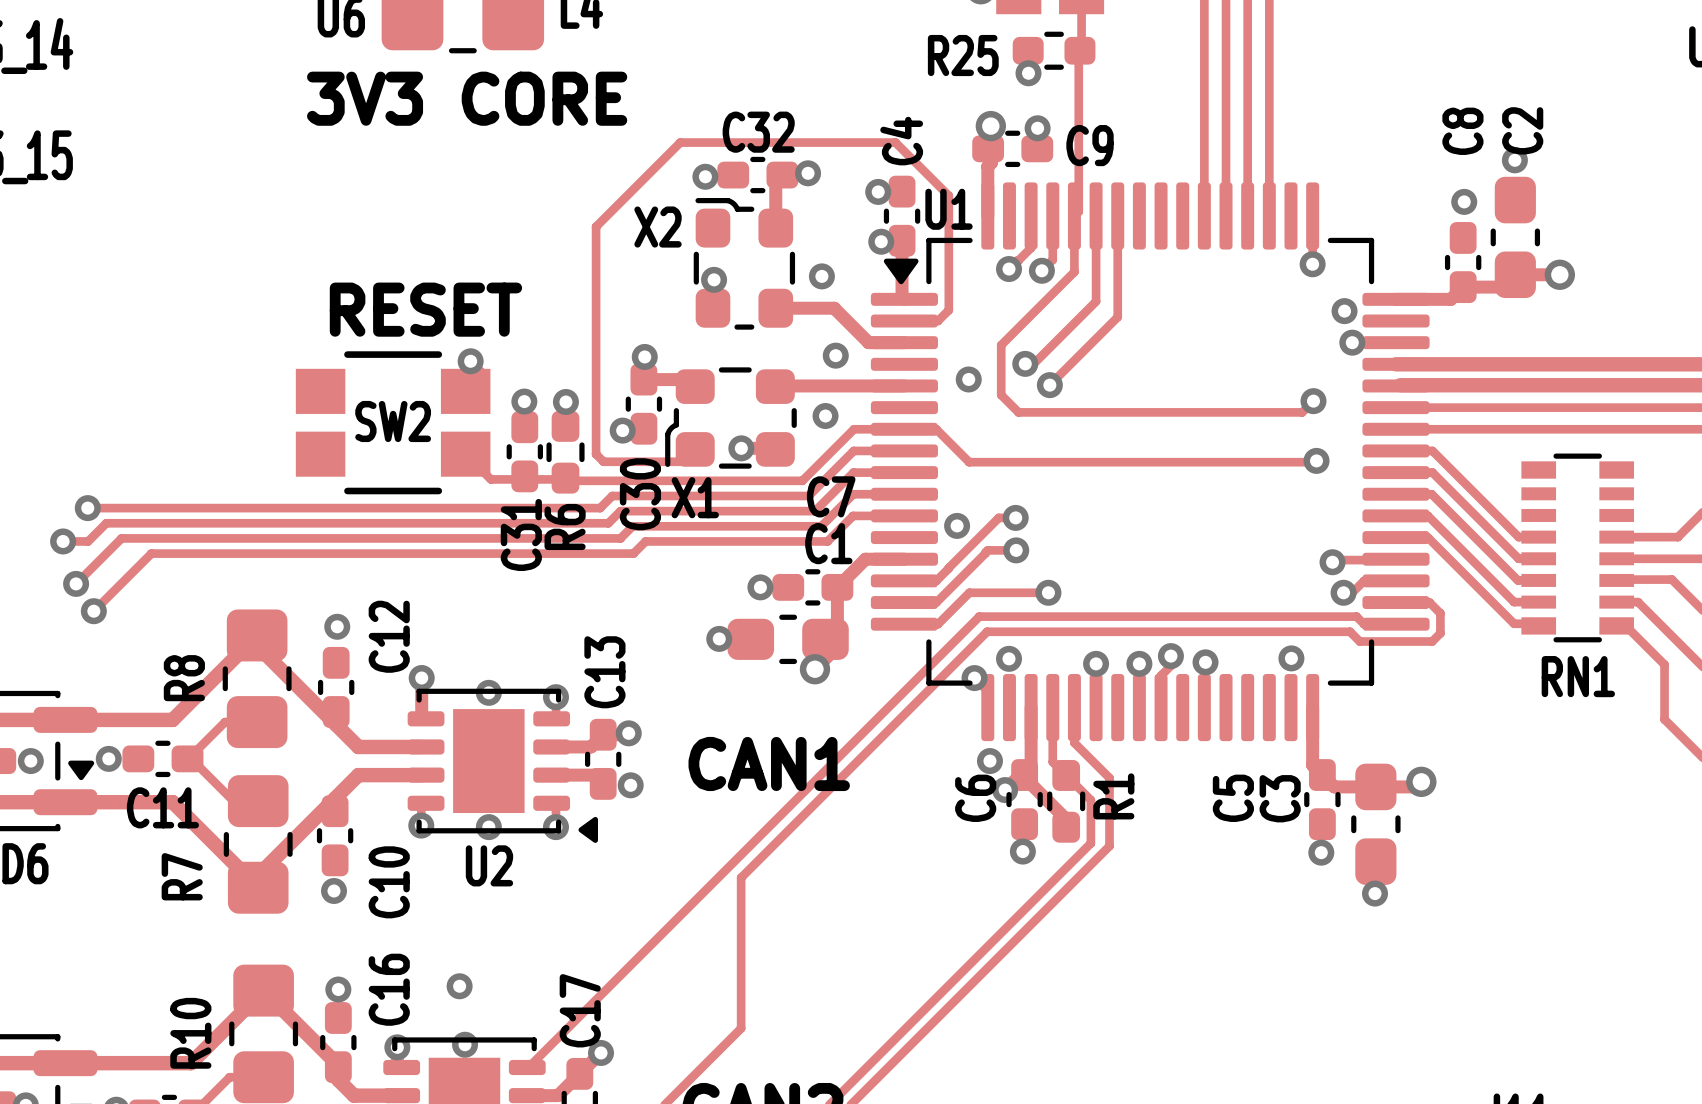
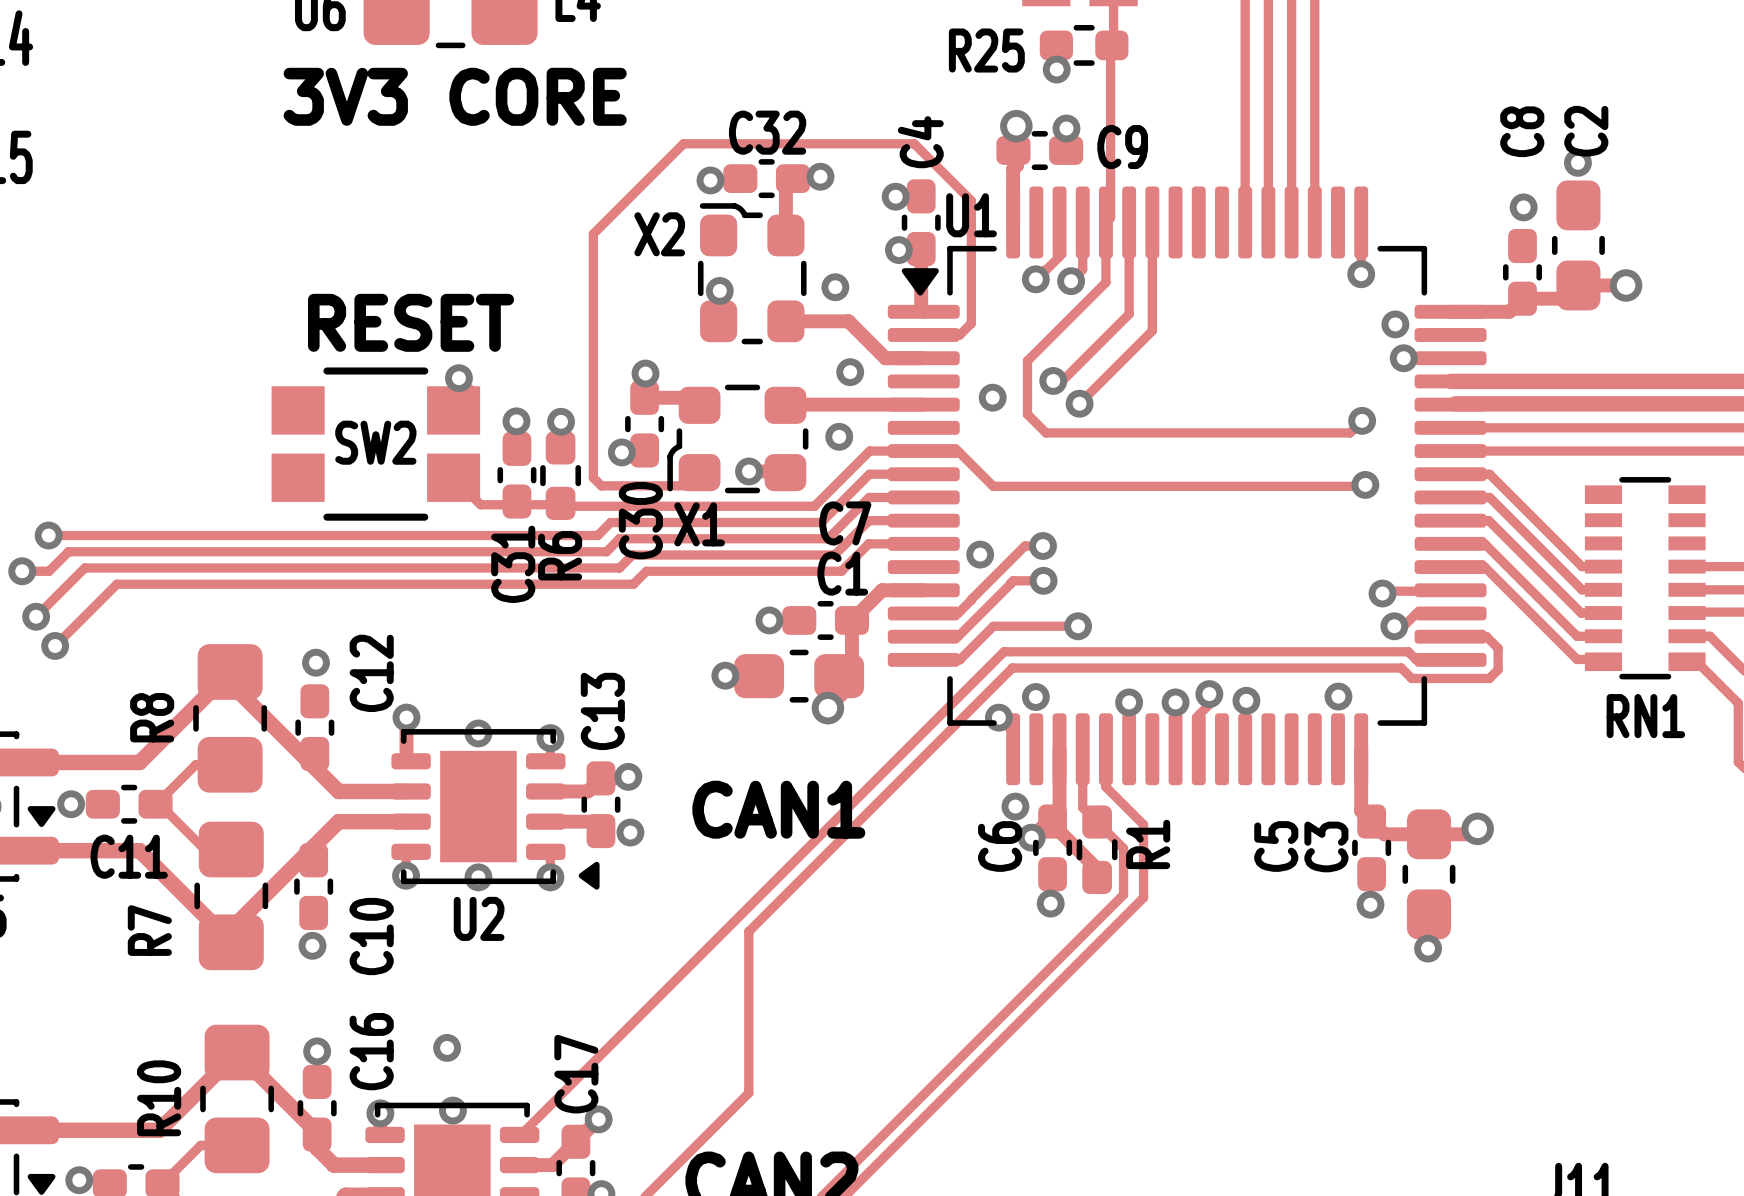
U2 footprint: [407, 688, 598, 843] -> [391, 729, 600, 890]

